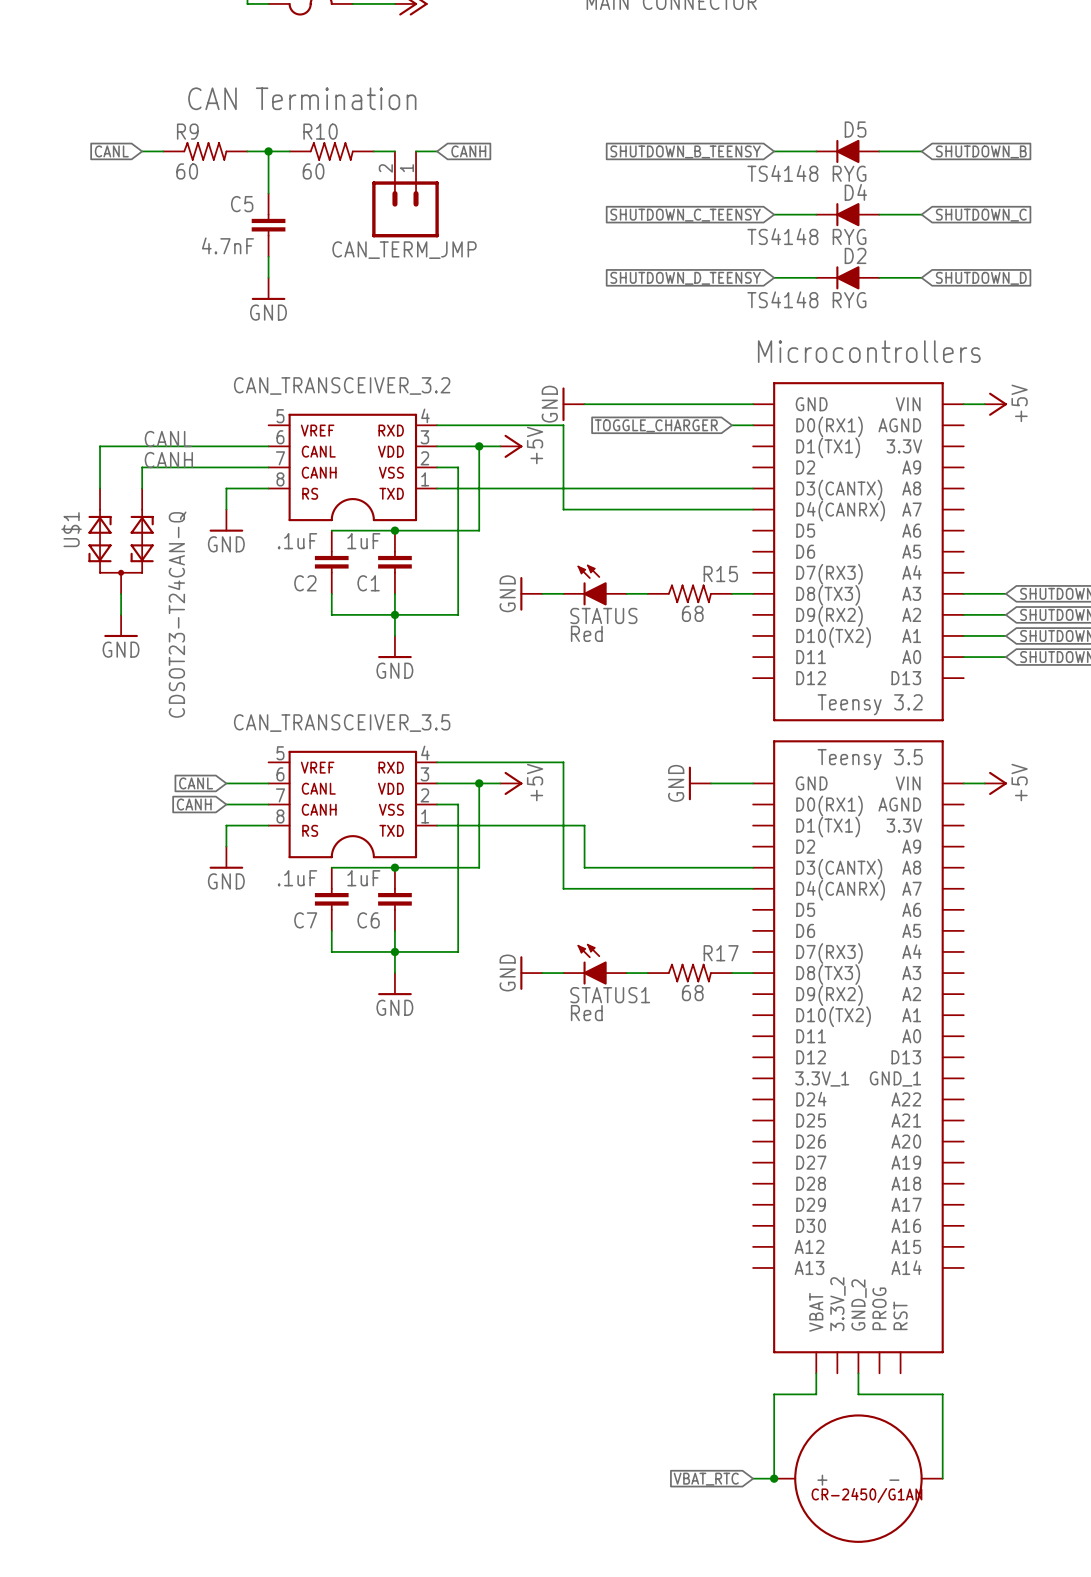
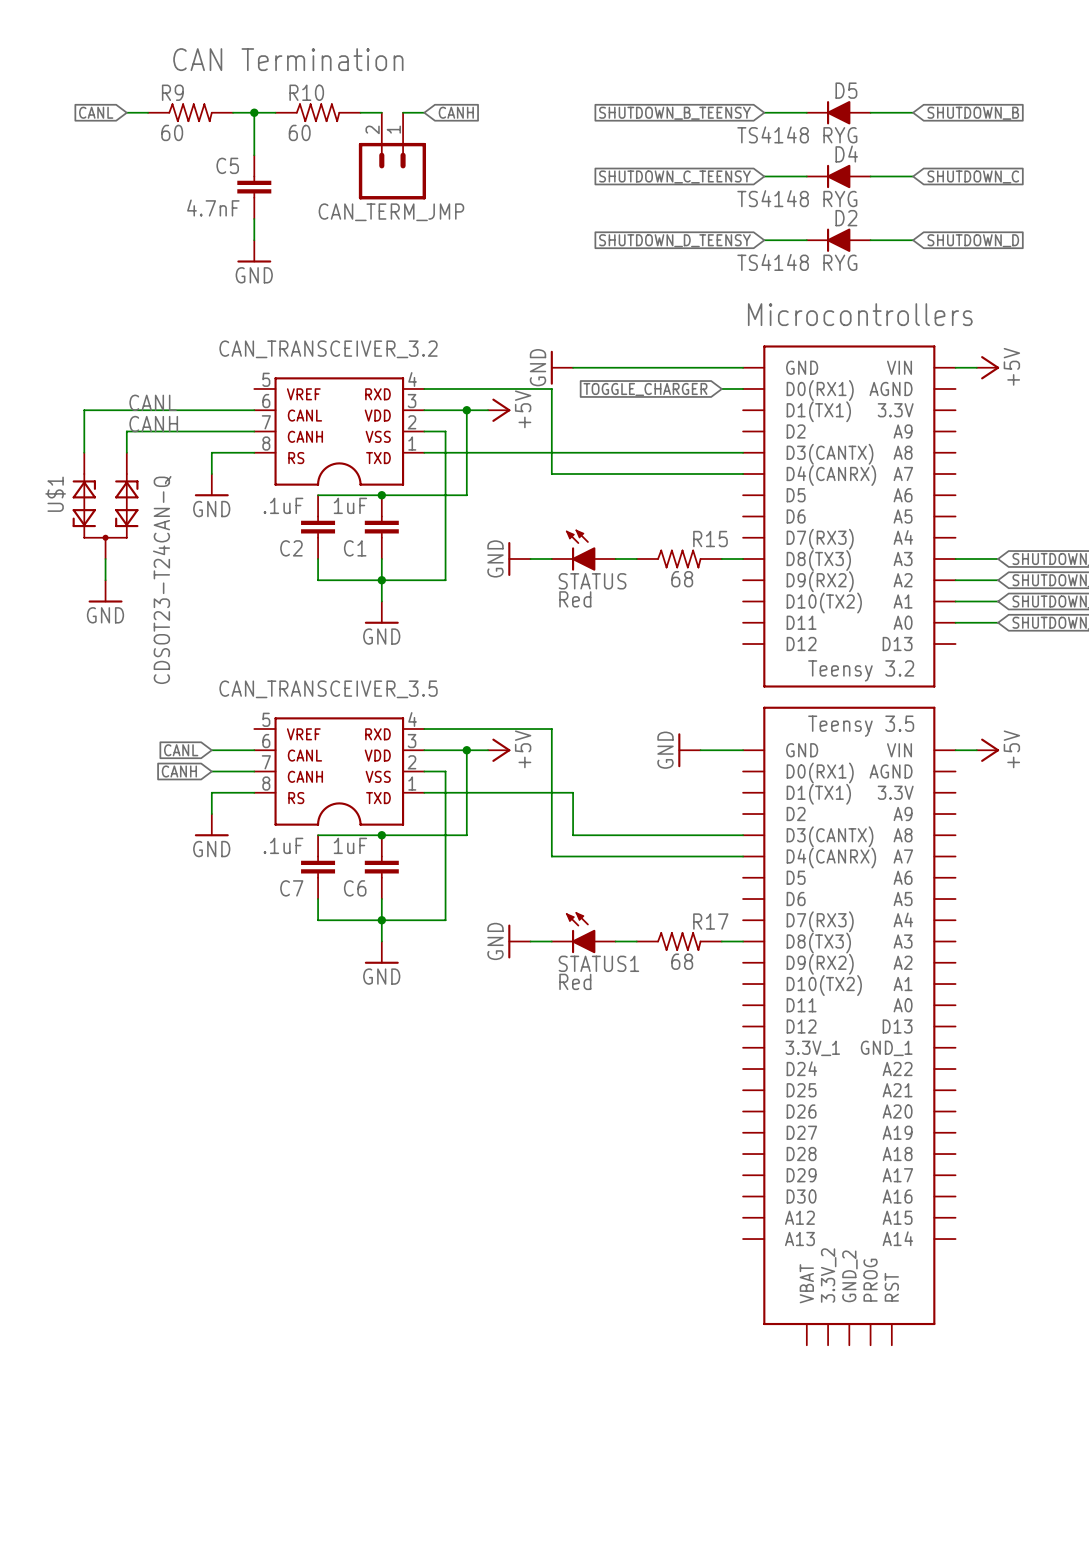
wire: (816, 1373) (816, 1394) (774, 1394) (774, 1478) (753, 1478) -> none
wire: (858, 1373) (858, 1394) (942, 1394) (942, 1478) -> none
junction: (774, 1478) -> none
part: (858, 1478) -> none
global label: VBAT_RTC (706, 1479) -> none

